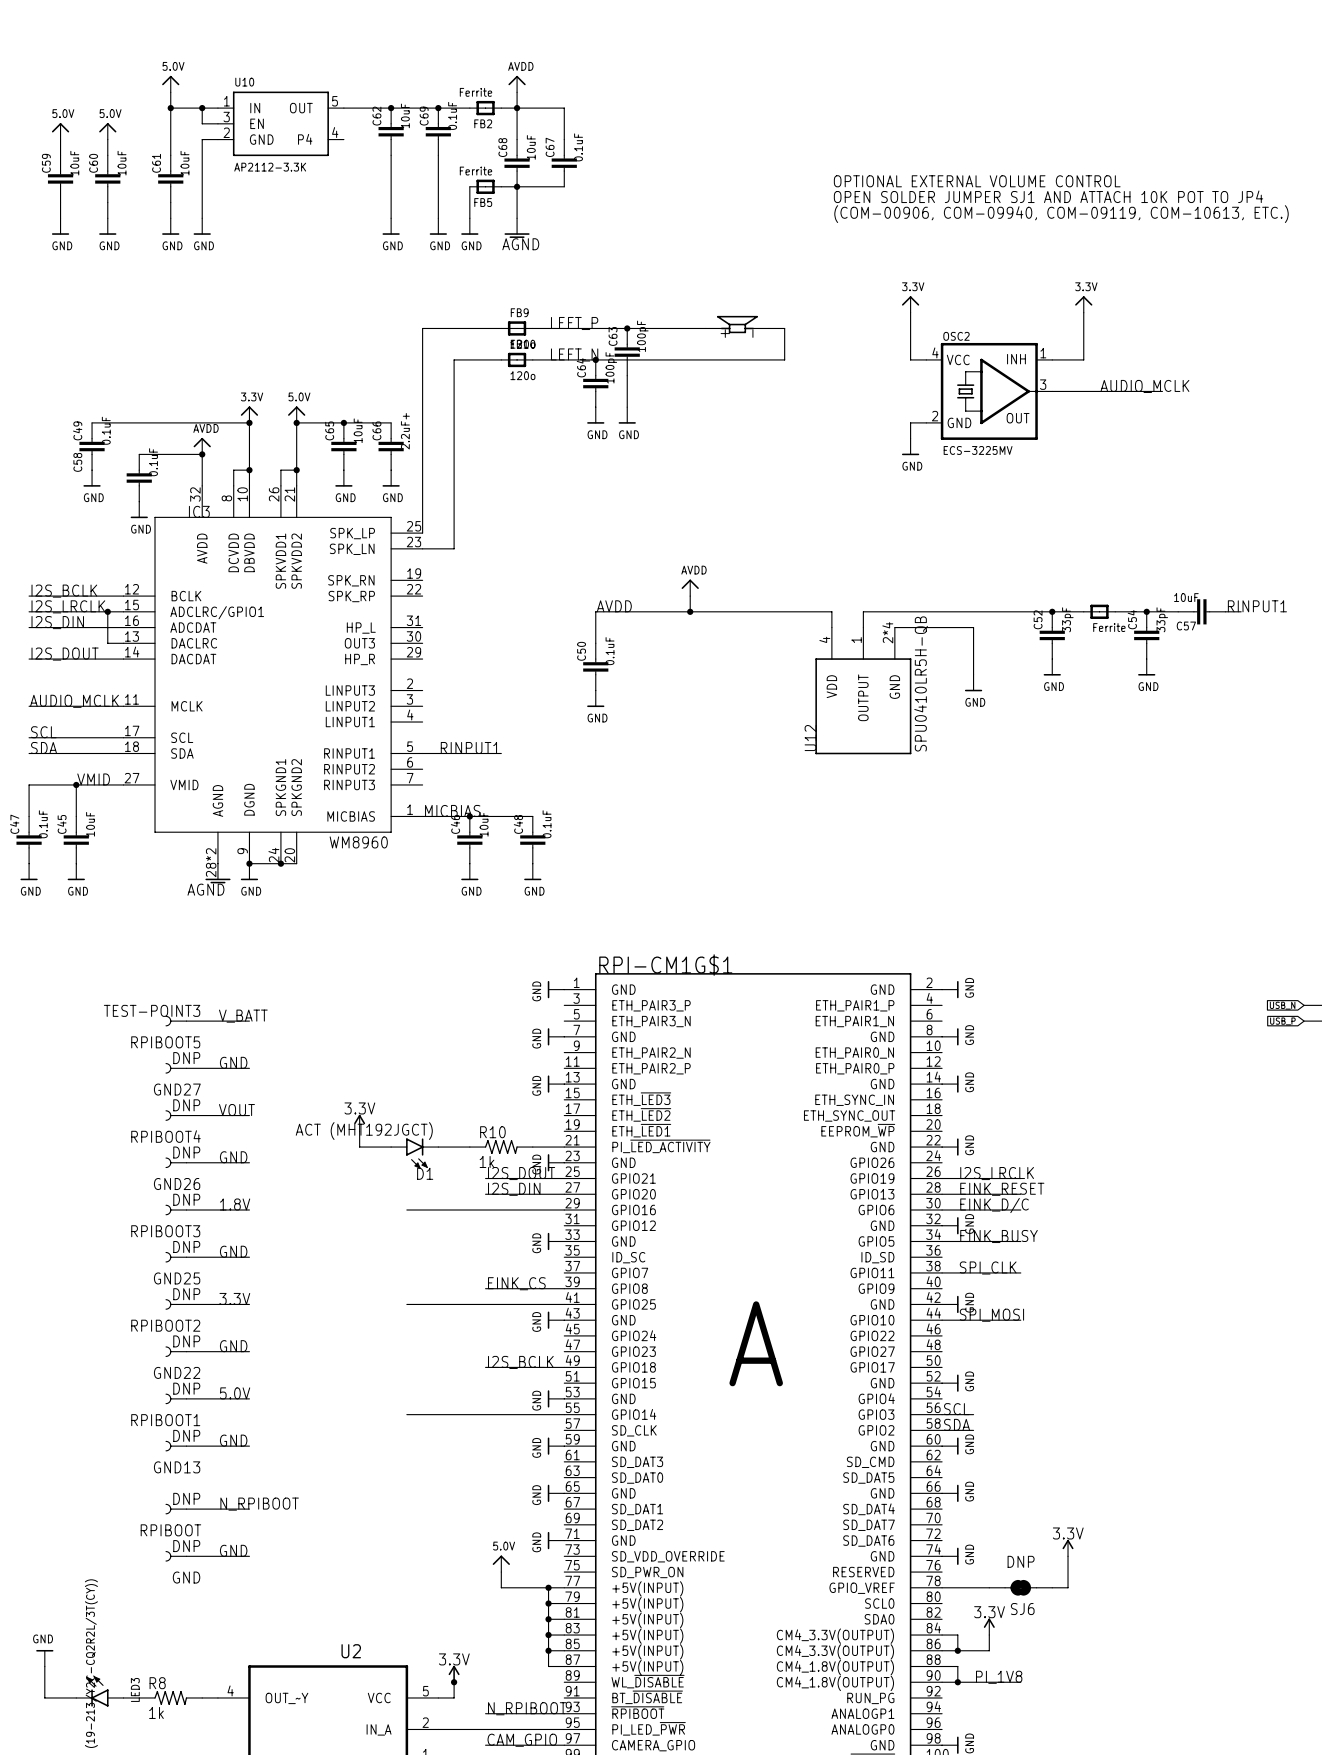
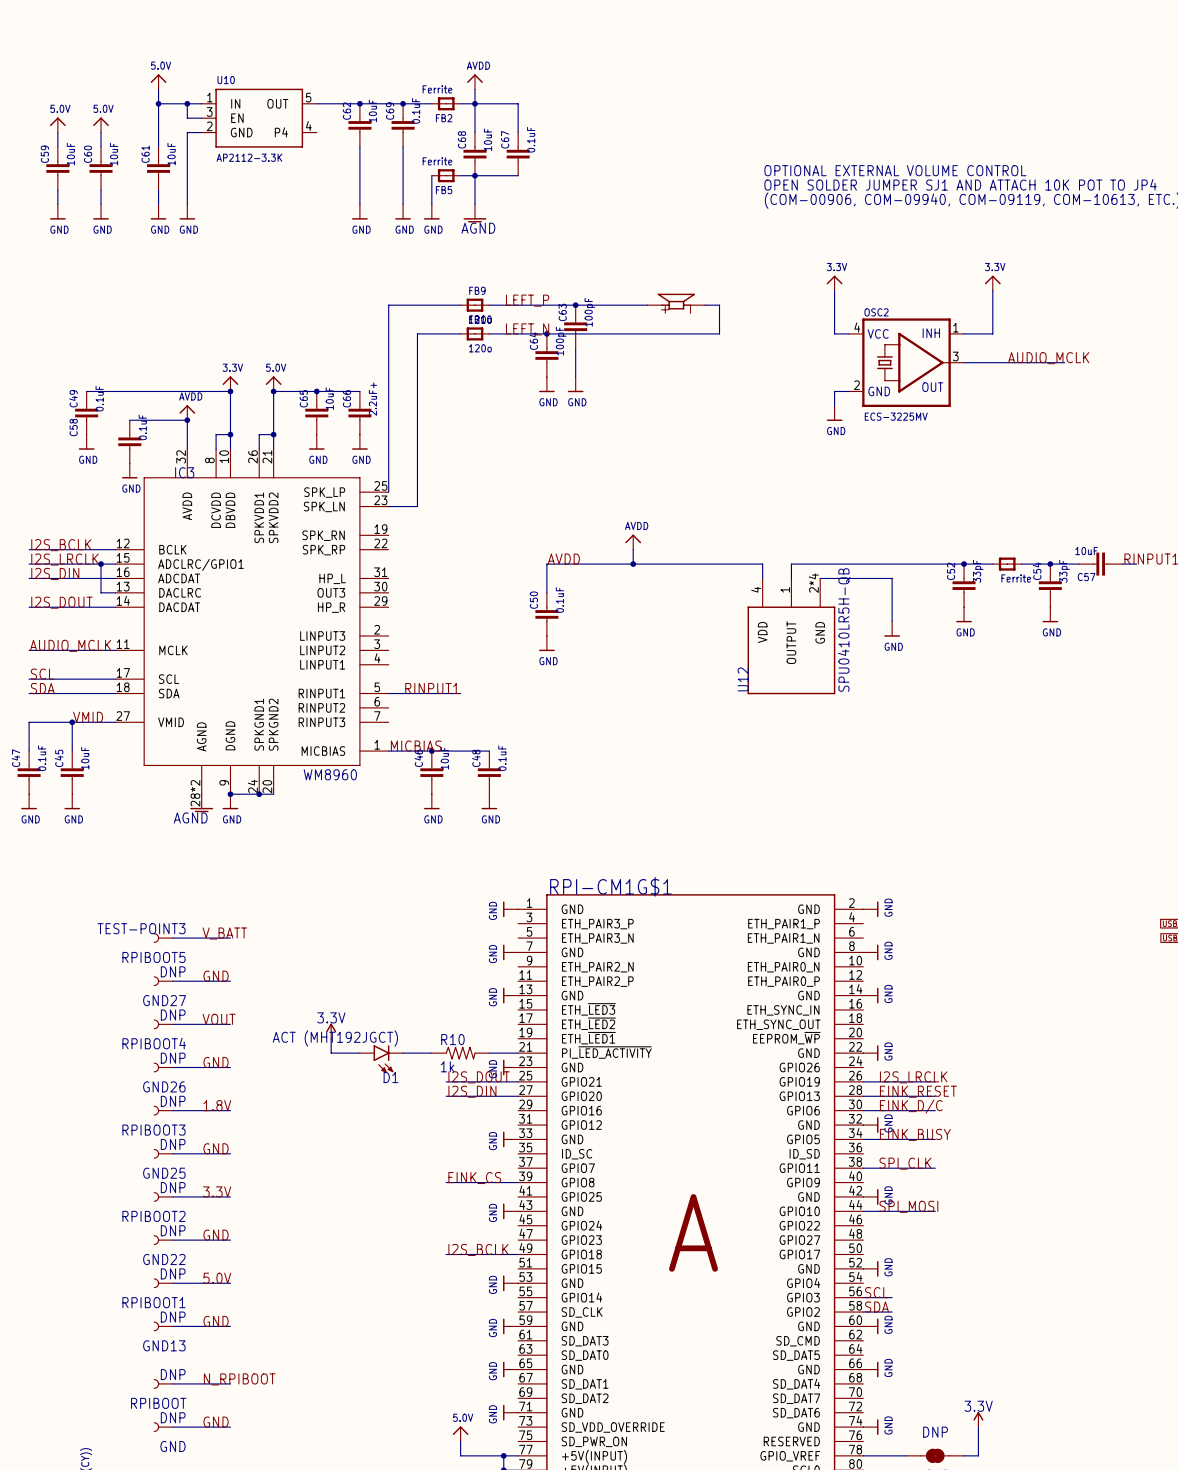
wire: (406, 1210) (564, 1210) -> none
wire: (406, 1304) (564, 1304) -> none
wire: (406, 1414) (564, 1414) -> none

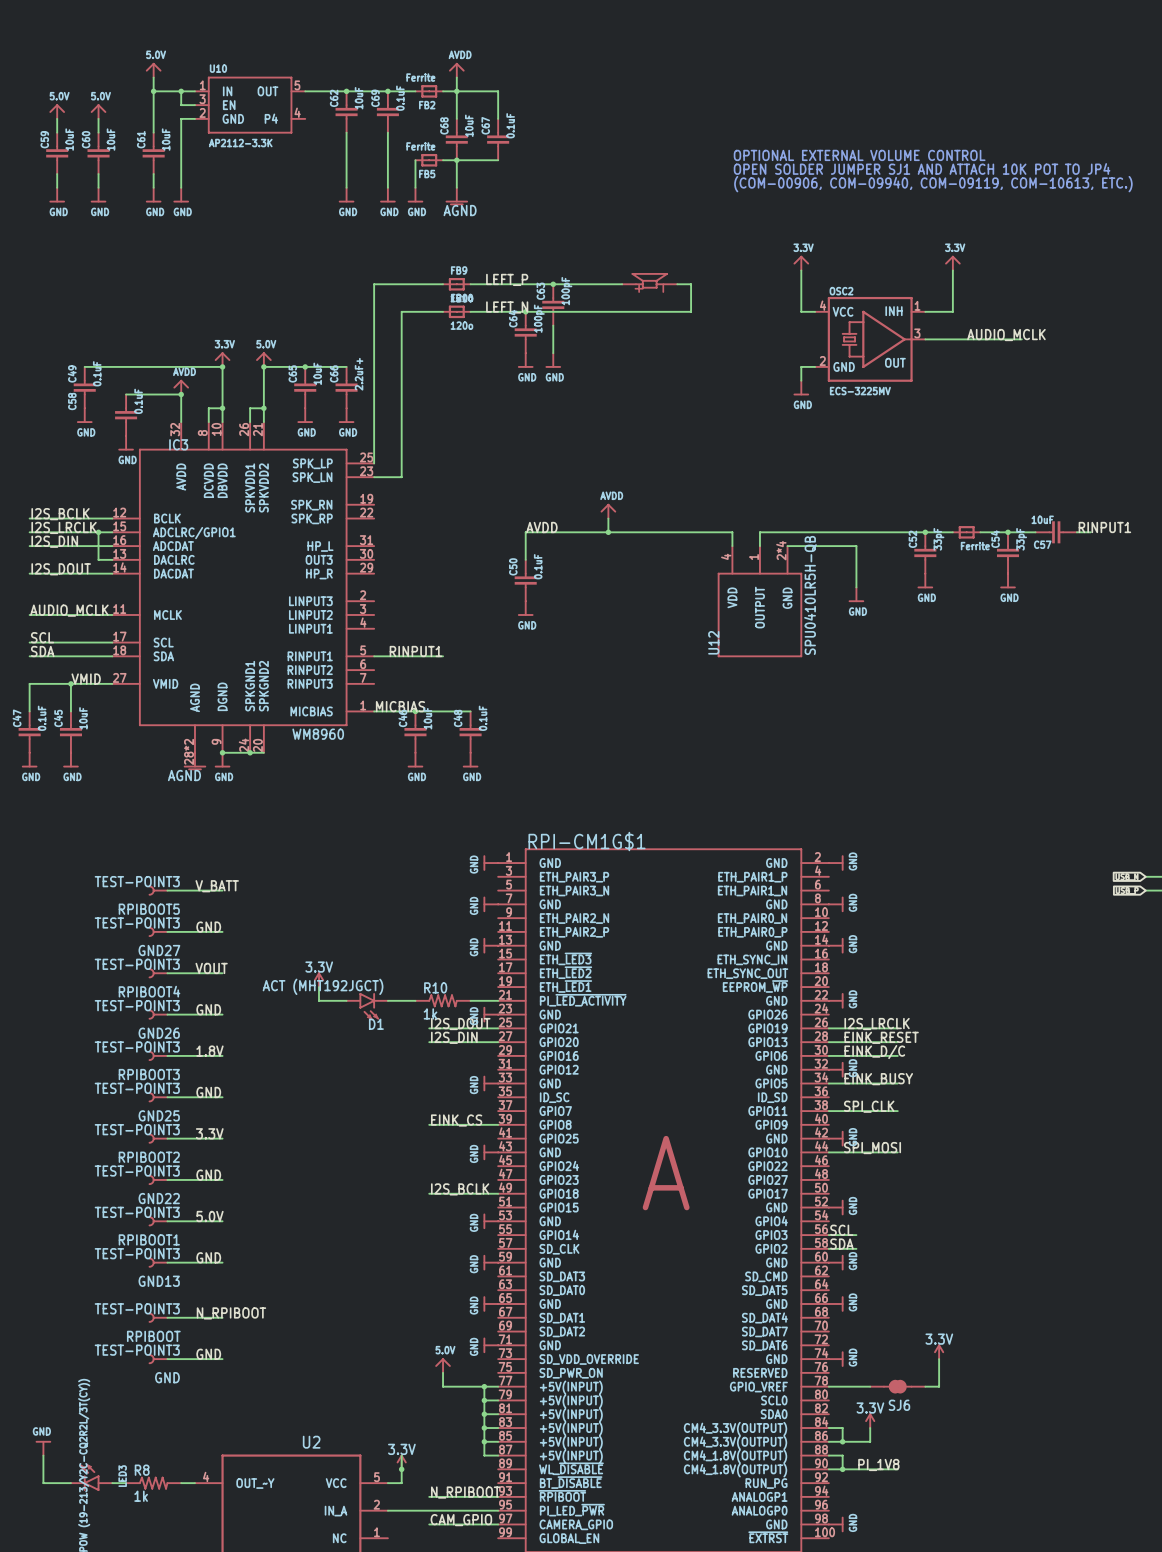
GND27 value: DNP (173, 971) -> TEST-POINT3 (137, 922)
RPIBOOT4 value: DNP (173, 1015) -> TEST-POINT3 (137, 964)
GND26 value: DNP (173, 1058) -> TEST-POINT3 (137, 1005)
RPIBOOT3 value: DNP (173, 1101) -> TEST-POINT3 (137, 1046)
GND25 value: DNP (173, 1144) -> TEST-POINT3 (137, 1088)
RPIBOOT2 value: DNP (173, 1187) -> TEST-POINT3 (137, 1129)
GND22 value: DNP (173, 1230) -> TEST-POINT3 (137, 1171)
RPIBOOT1 value: DNP (173, 1273) -> TEST-POINT3 (137, 1212)
GND13 value: DNP (173, 1317) -> TEST-POINT3 (137, 1253)
RPIBOOT value: DNP (173, 1374) -> TEST-POINT3 (137, 1308)
GND value: DNP (173, 1417) -> TEST-POINT3 (137, 1350)
SJ6 value: DNP (935, 1432) -> none

